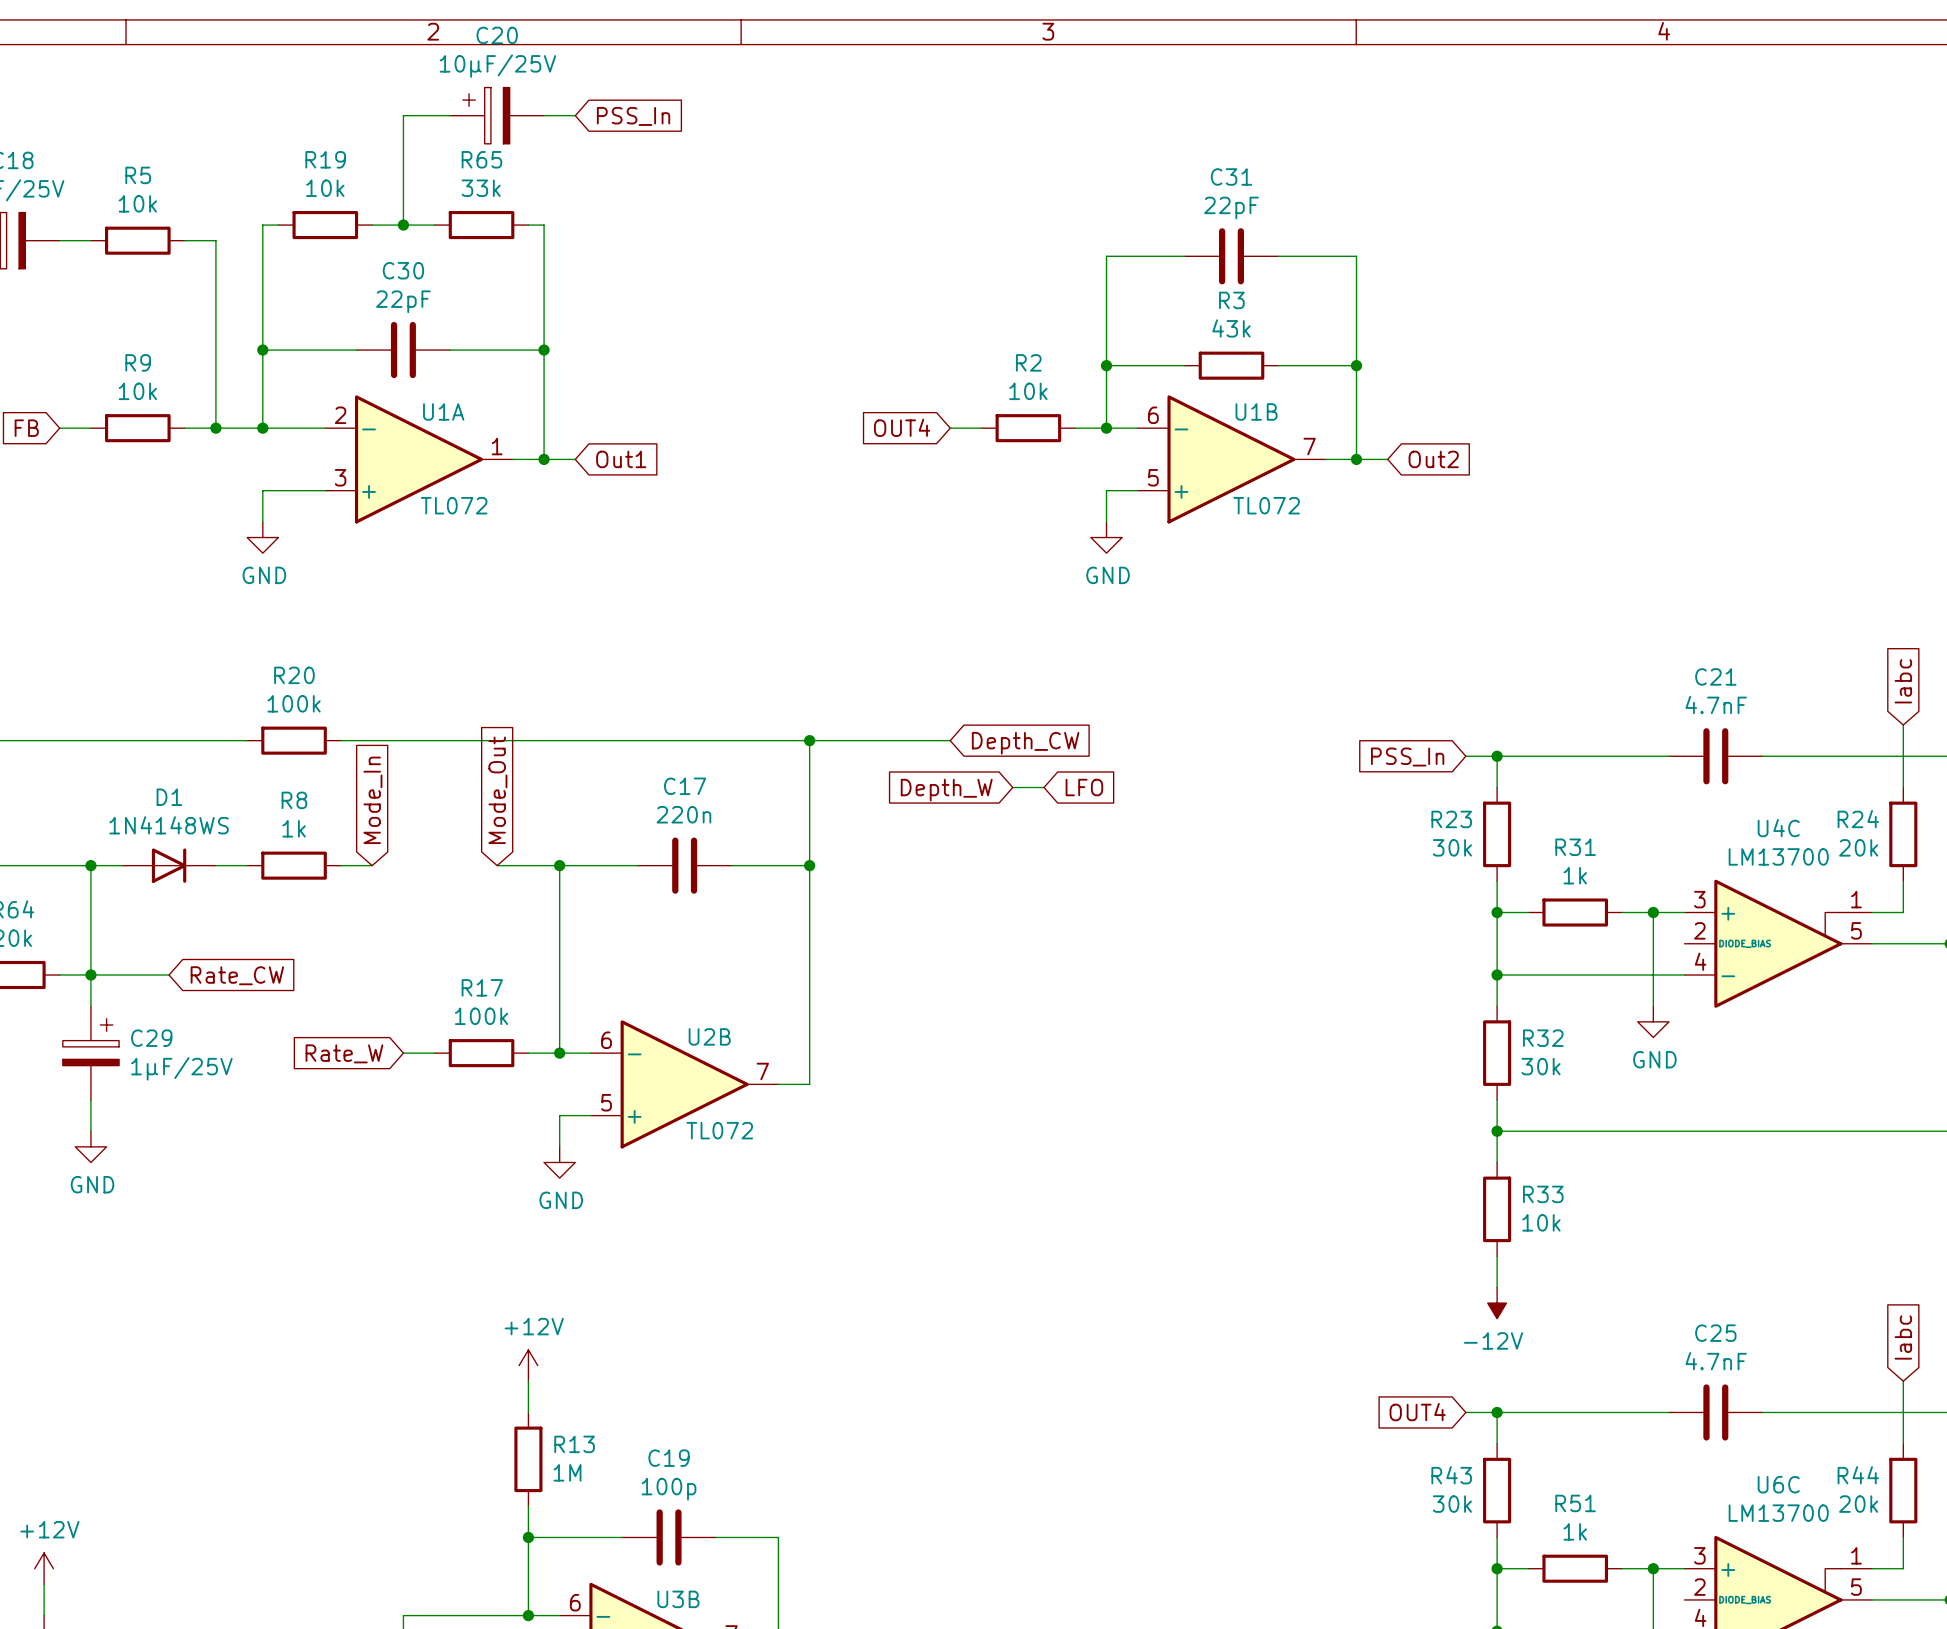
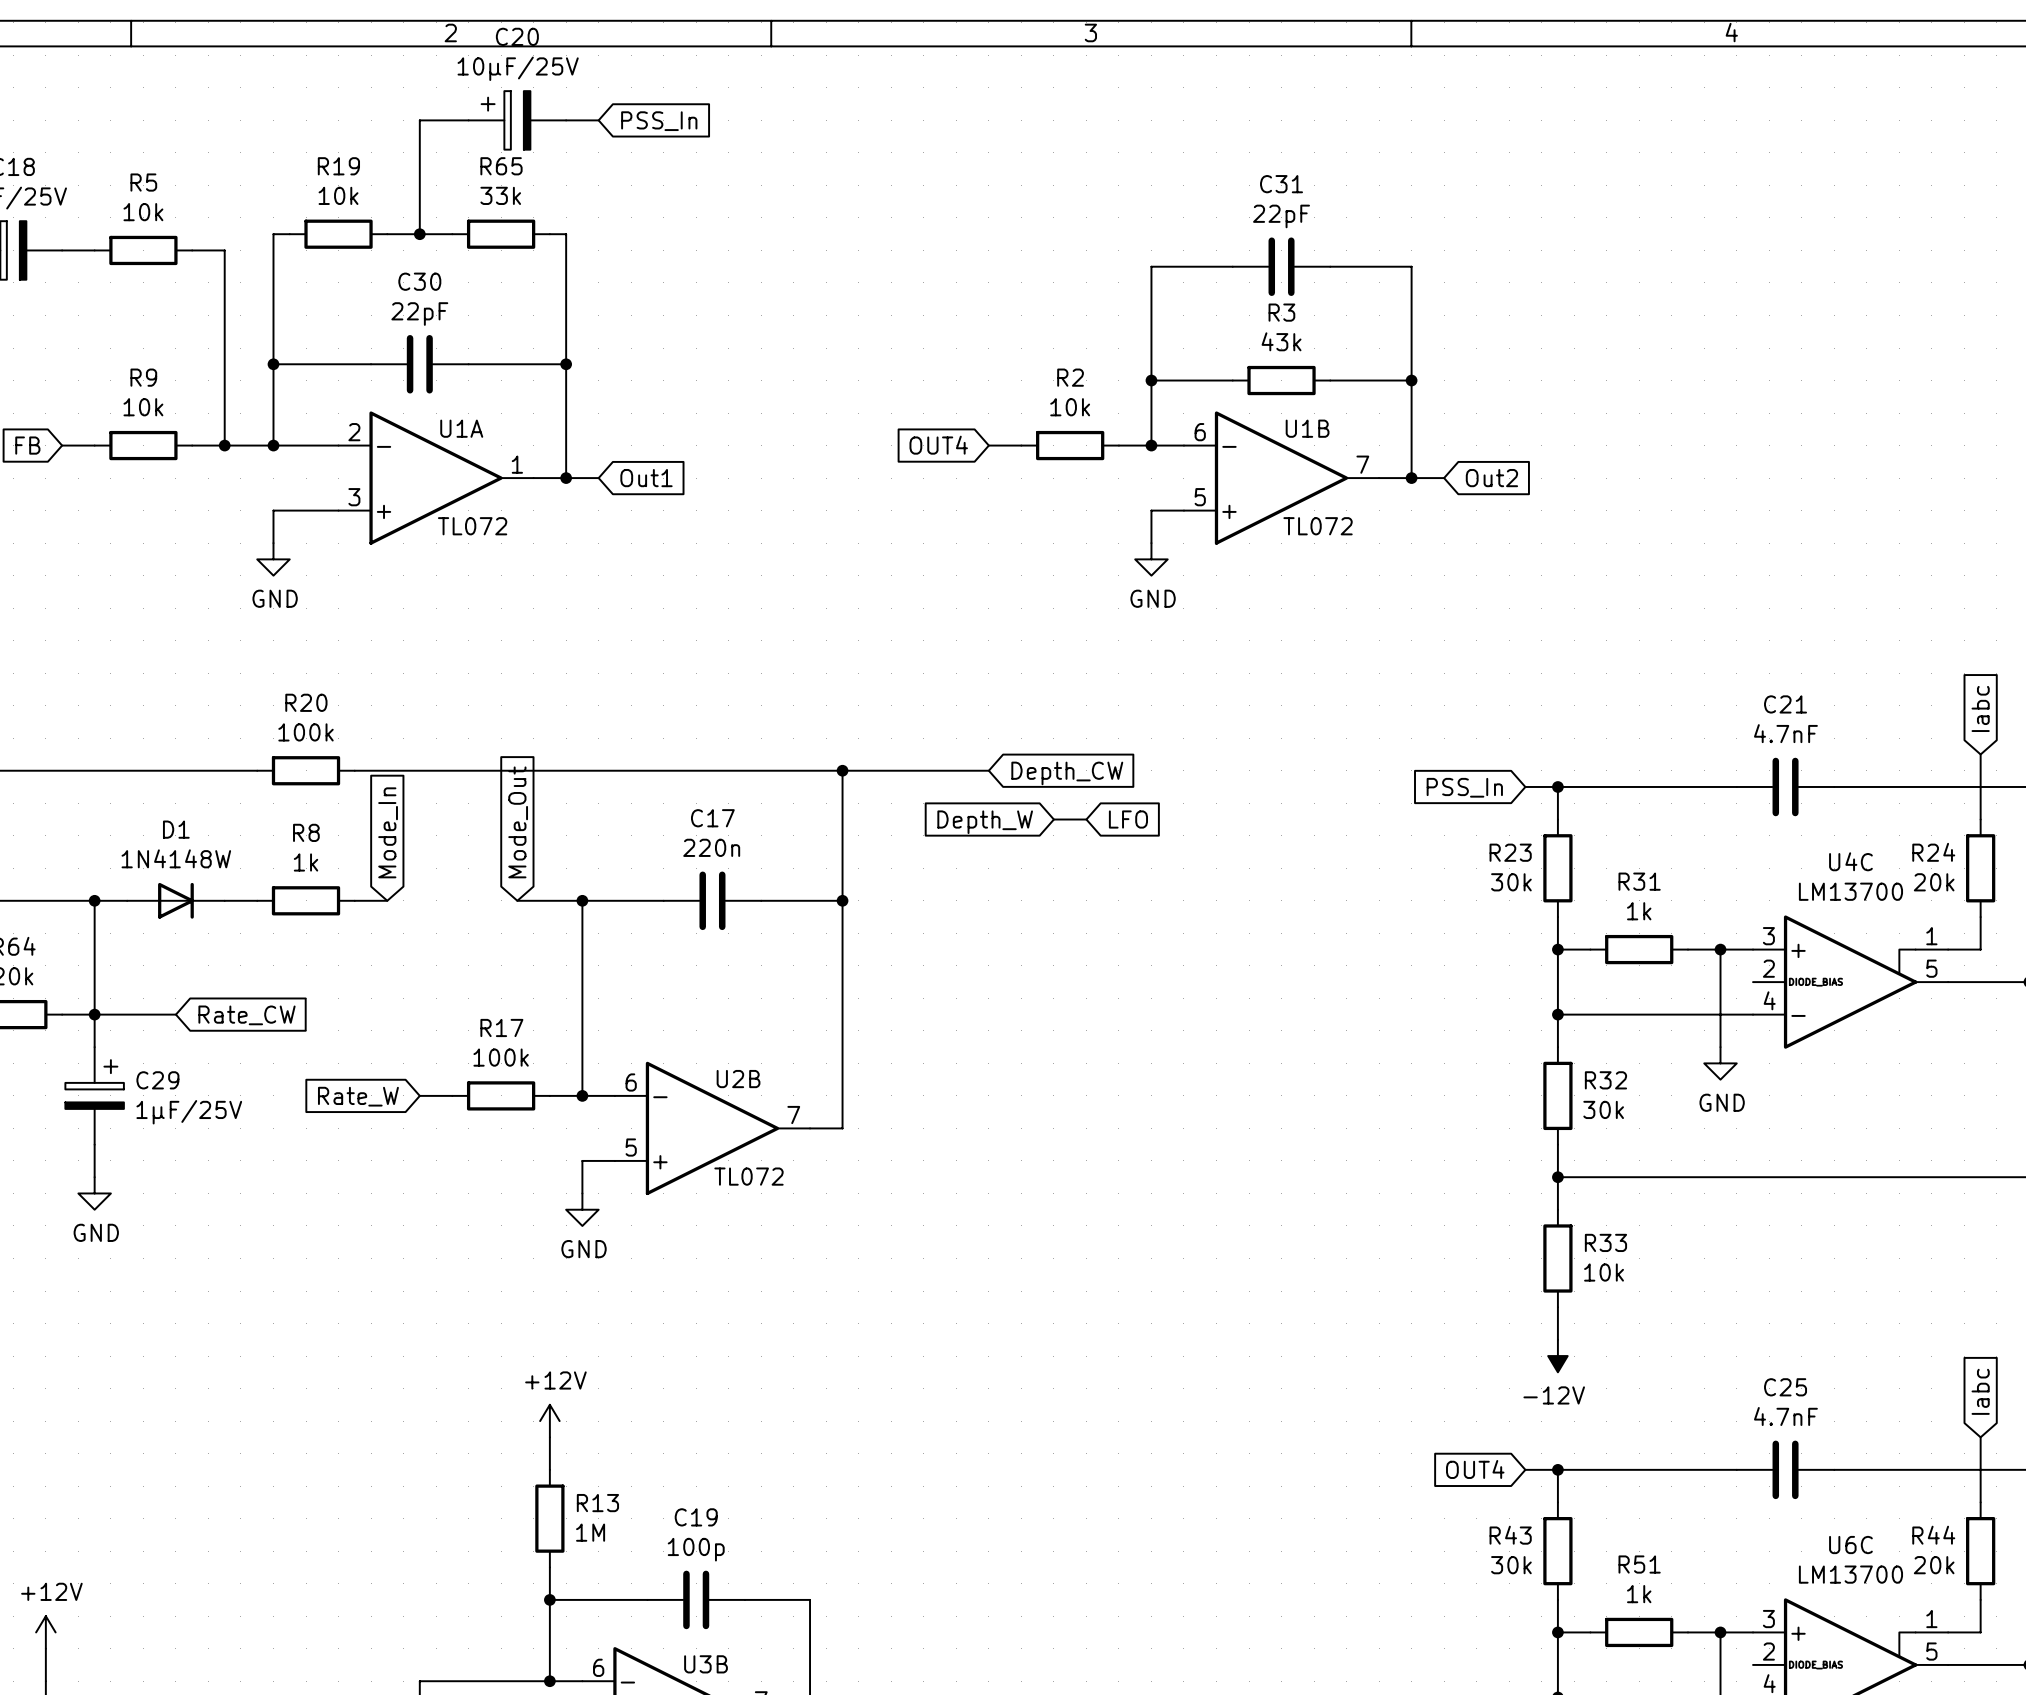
D1 value: 1N4148WS (169, 825) -> 1N4148W (176, 858)

